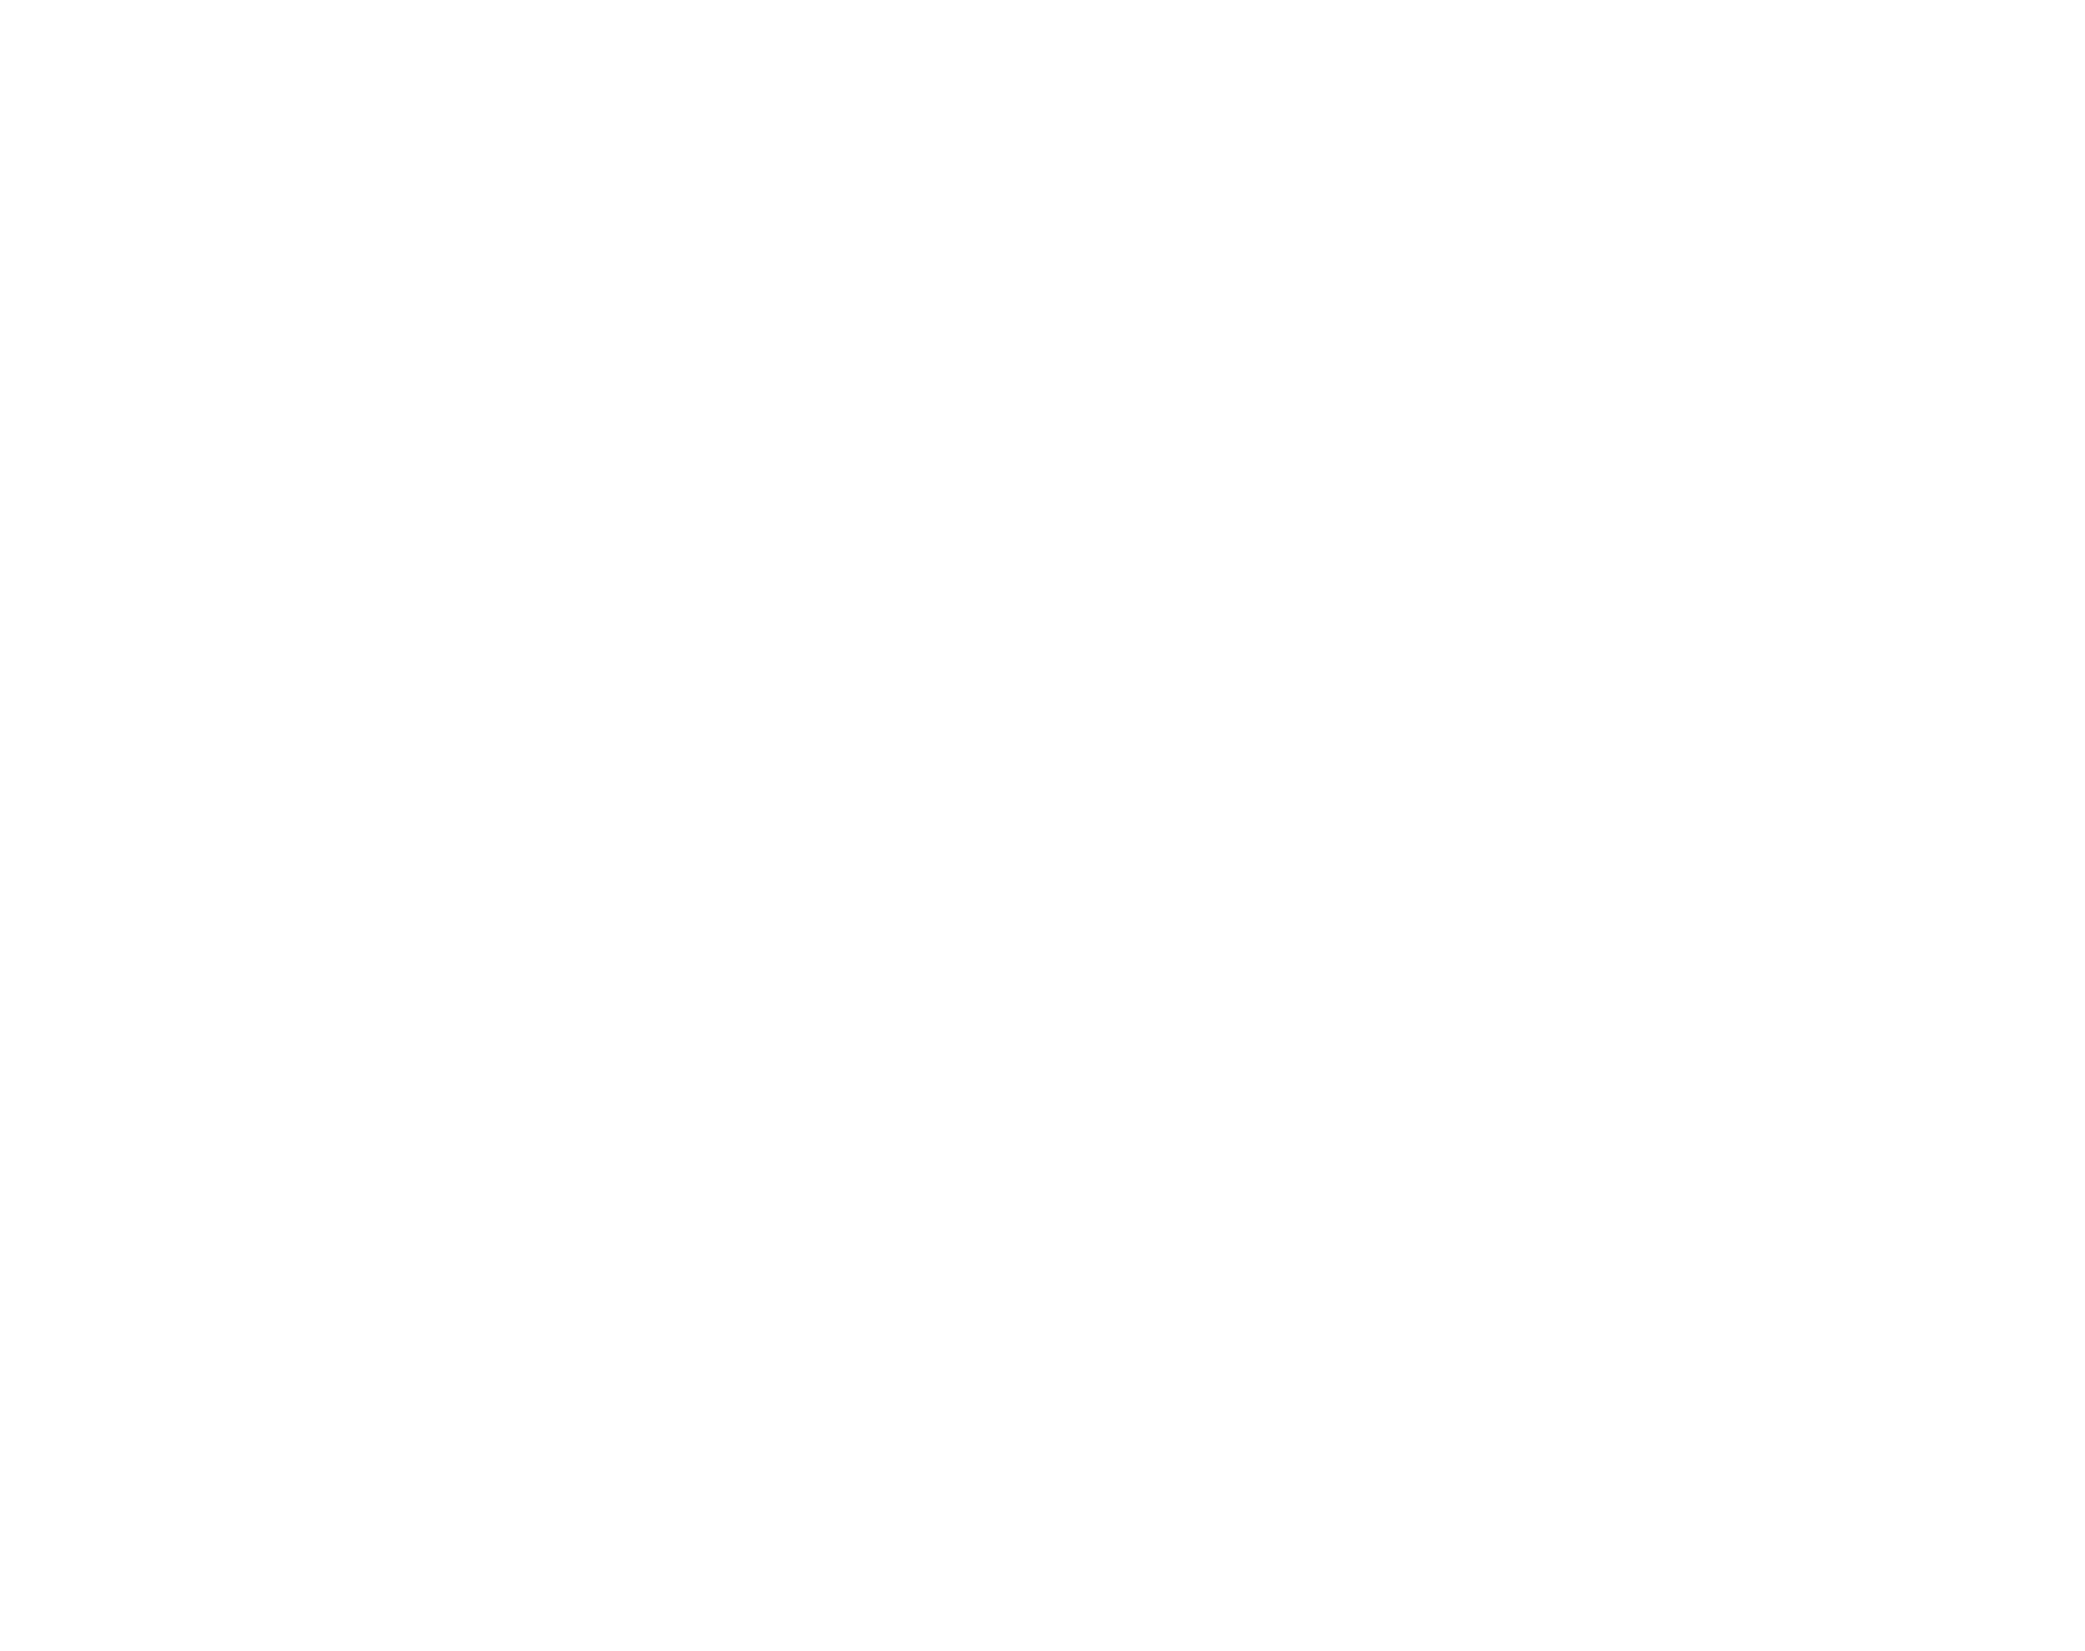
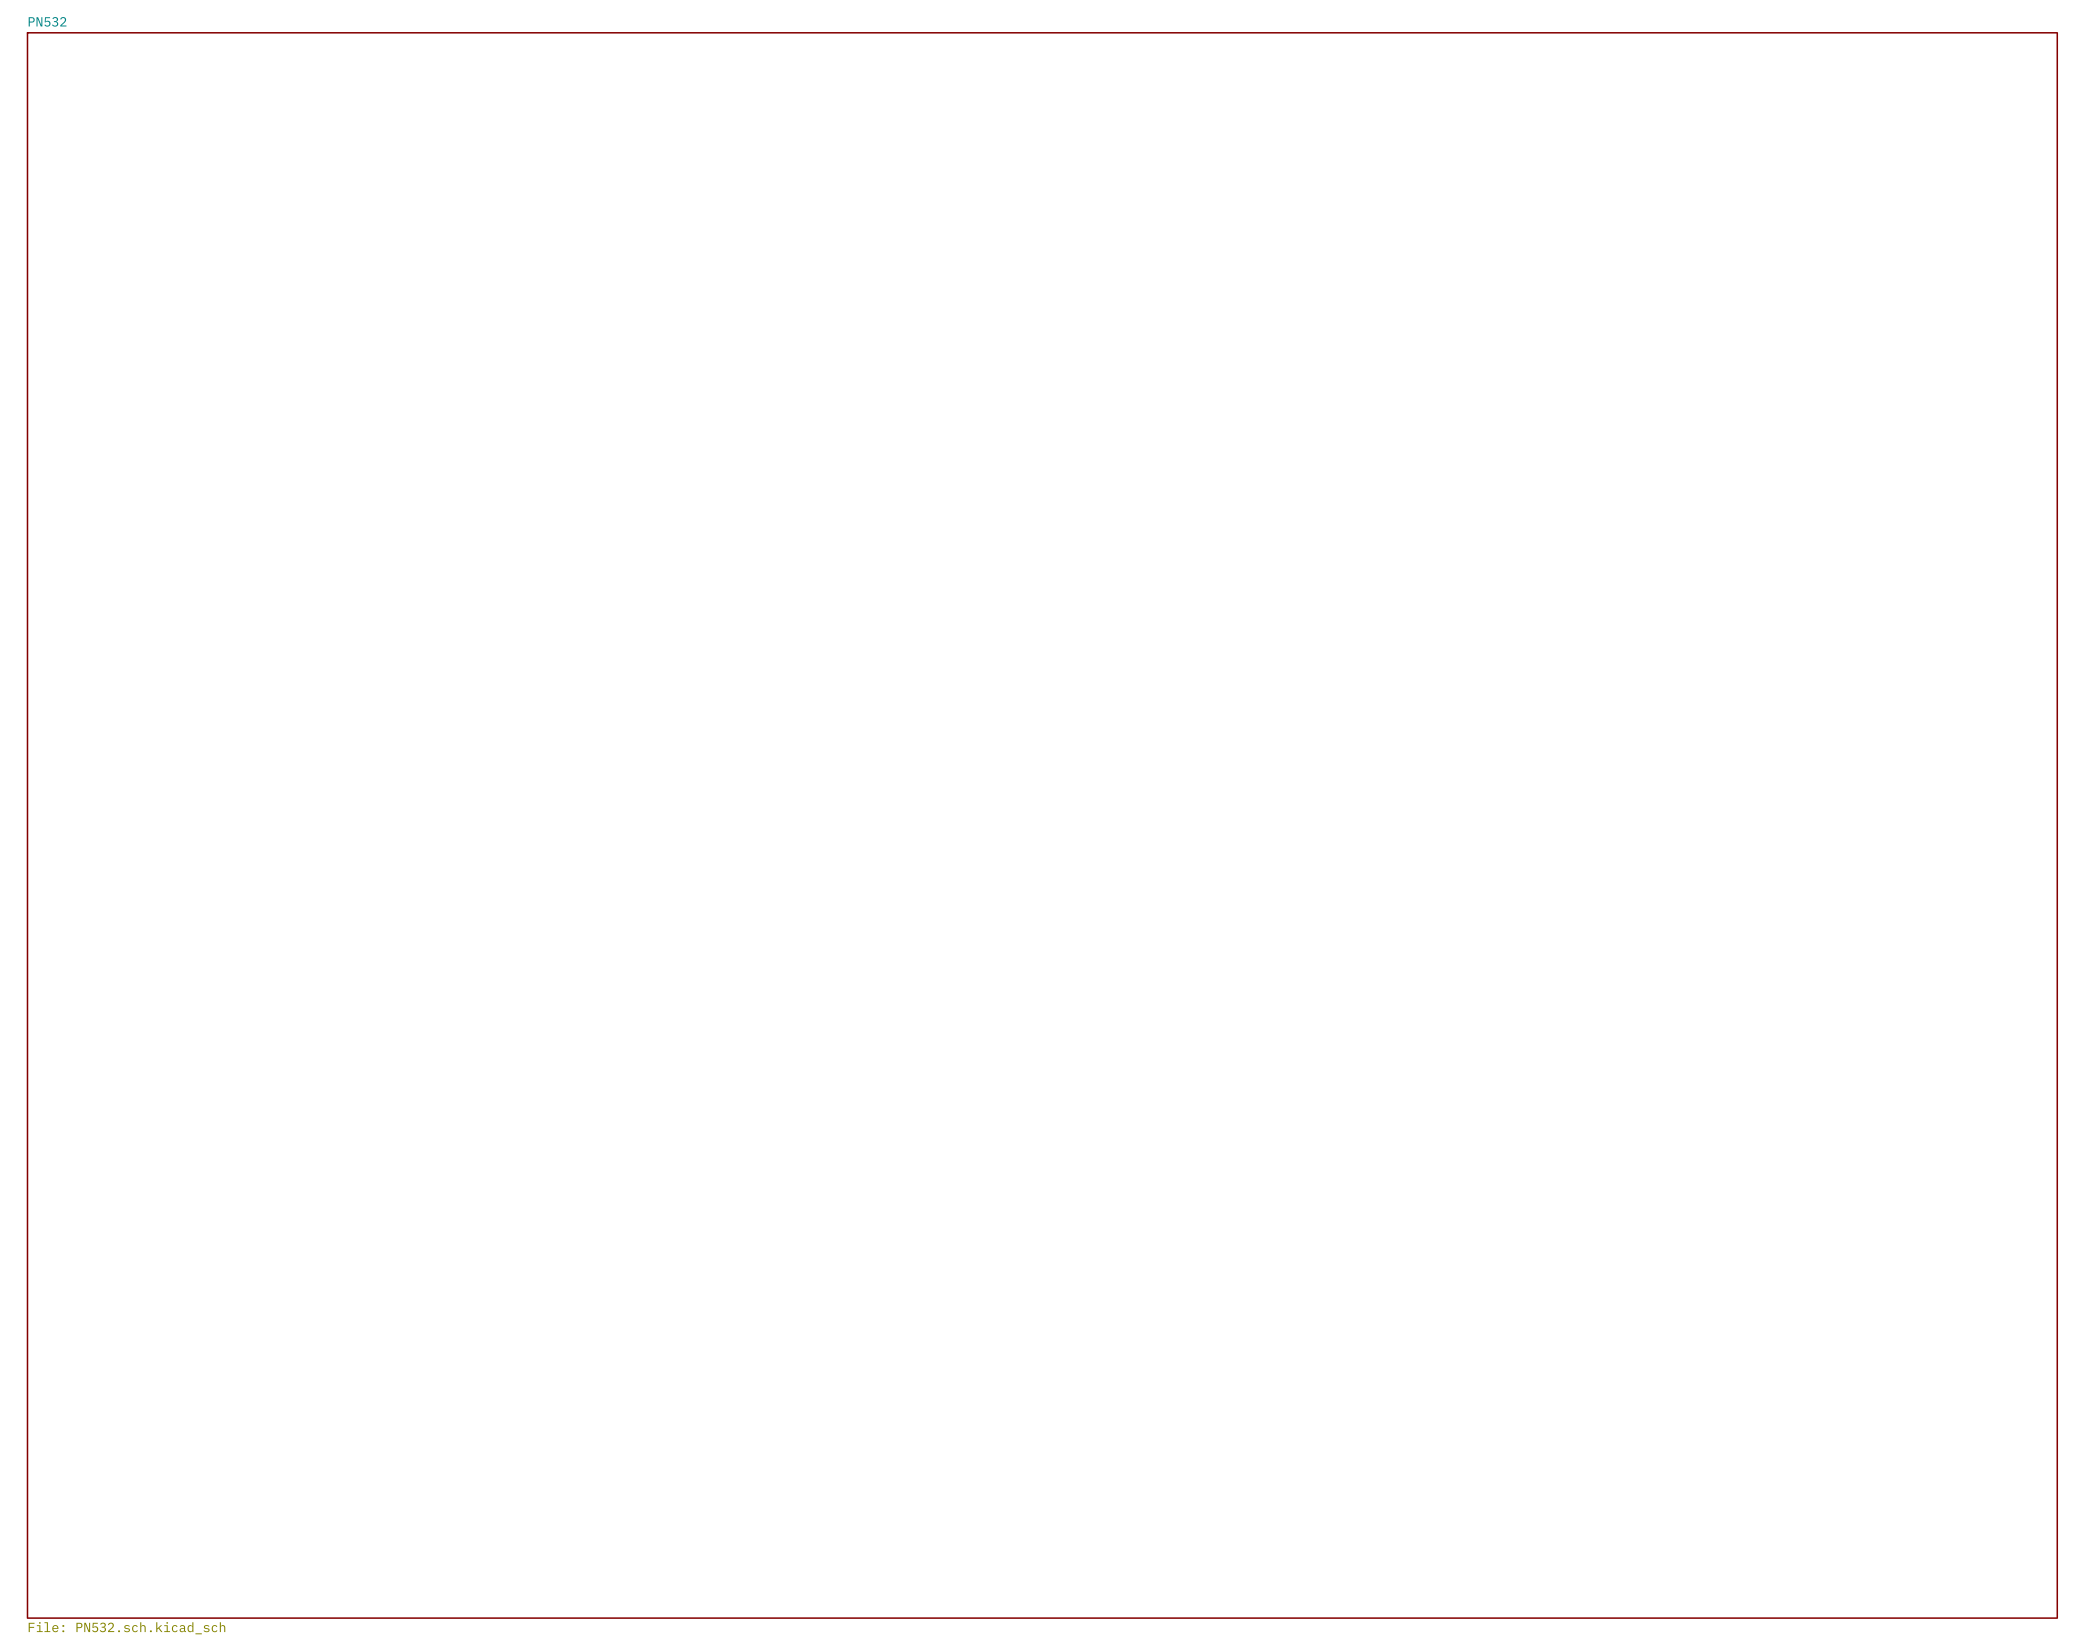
sheet PN532: none -> File: PN532.sch.kicad_sch (1042, 825)

